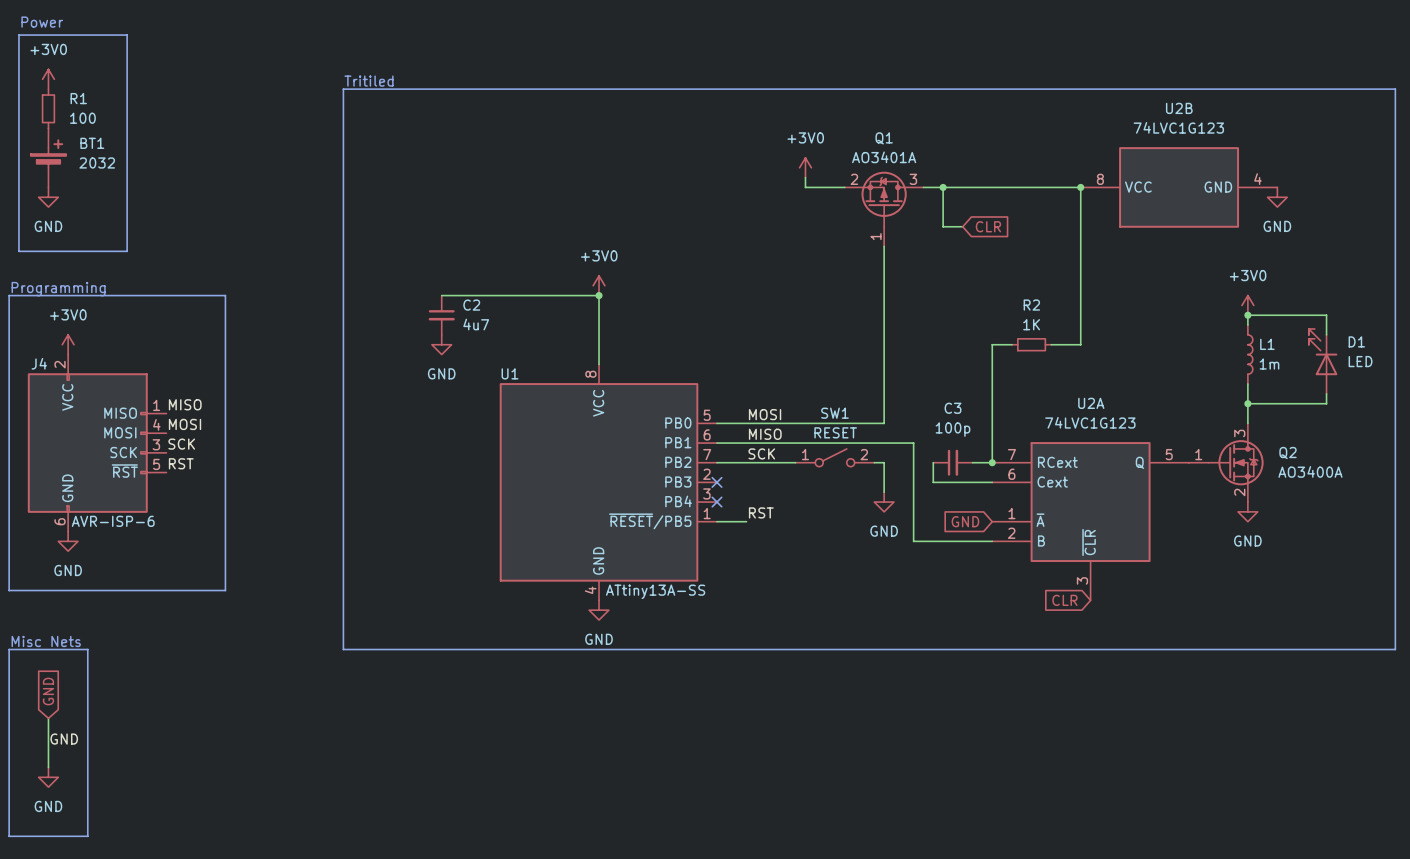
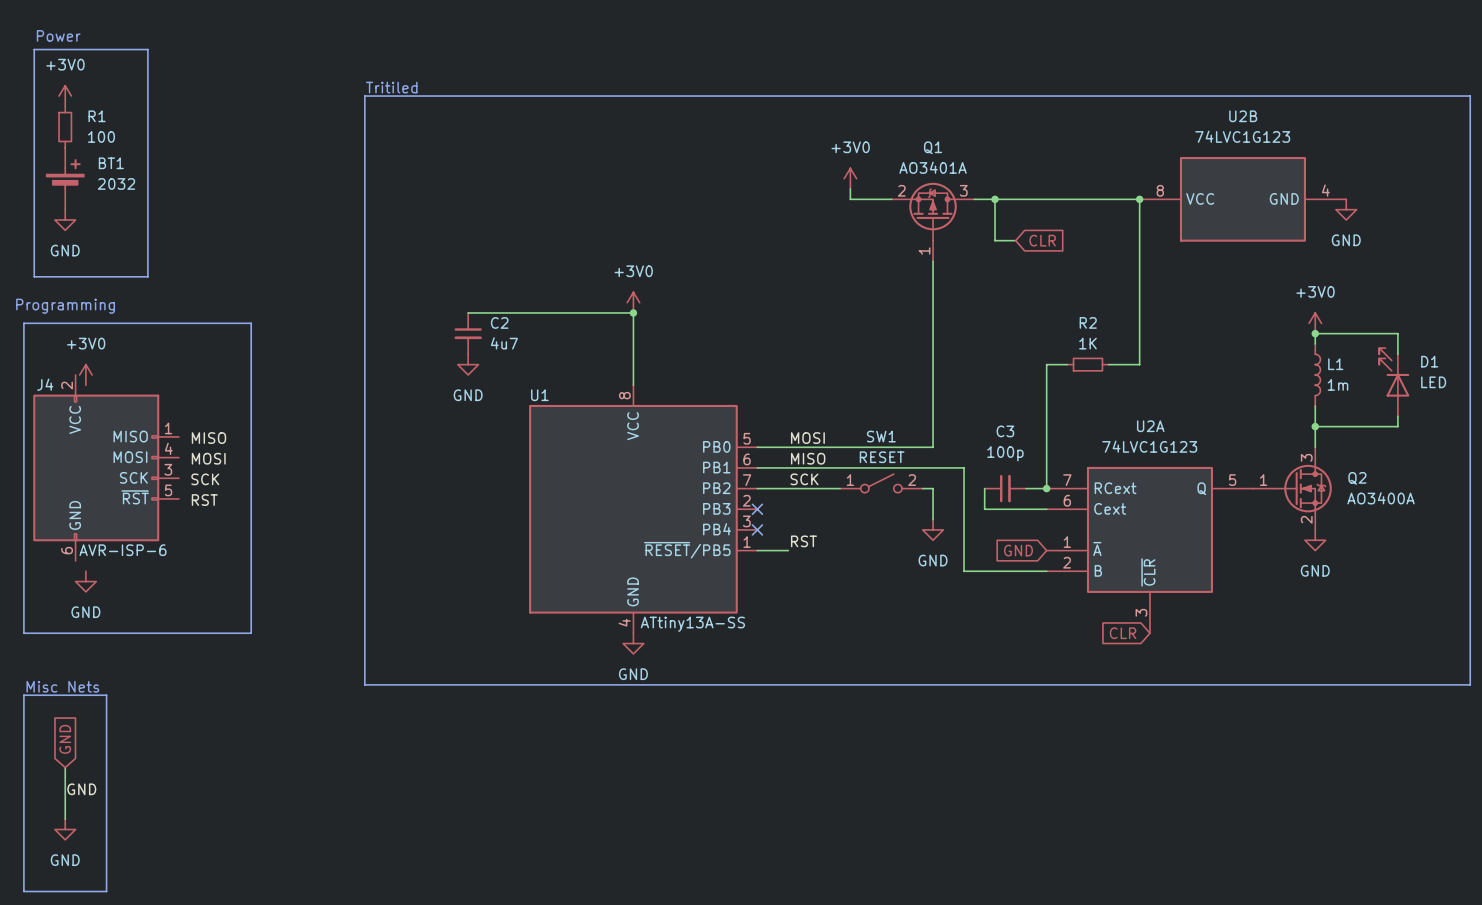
text position: Power (42, 22) -> Power (58, 35)
line: (18, 35) (127, 35) (127, 251) (18, 251) (18, 35) -> (34, 49) (147, 49) (147, 276) (34, 276) (34, 49)
power symbol position: +3V0 (48, 79) -> +3V0 (65, 96)
R1 position: (48, 108) -> (65, 127)
BT1 position: (48, 157) -> (65, 178)
power symbol position: GND (48, 197) -> GND (65, 220)
line: (9, 295) (9, 590) (225, 590) (225, 295) (9, 295) -> (23, 323) (23, 633) (251, 633) (251, 323) (23, 323)
power symbol position: +3V0 (68, 344) -> +3V0 (85, 374)
label position: MISO (185, 404) -> MISO (208, 438)
label position: MOSI (185, 424) -> MOSI (208, 458)
label position: SCK (181, 444) -> SCK (205, 479)
label position: RST (181, 463) -> RST (204, 500)
power symbol position: GND (68, 541) -> GND (85, 581)
text position: Misc Nets (46, 641) -> Misc Nets (62, 686)
line: (9, 649) (87, 649) (87, 836) (9, 836) (9, 649) -> (23, 695) (106, 695) (106, 891) (23, 891) (23, 695)
global label position: GND (48, 691) -> GND (65, 739)
wire: (48, 718) (48, 767) -> (65, 767) (65, 819)
label position: GND (64, 739) -> GND (81, 789)
power symbol position: GND (48, 777) -> GND (65, 829)

